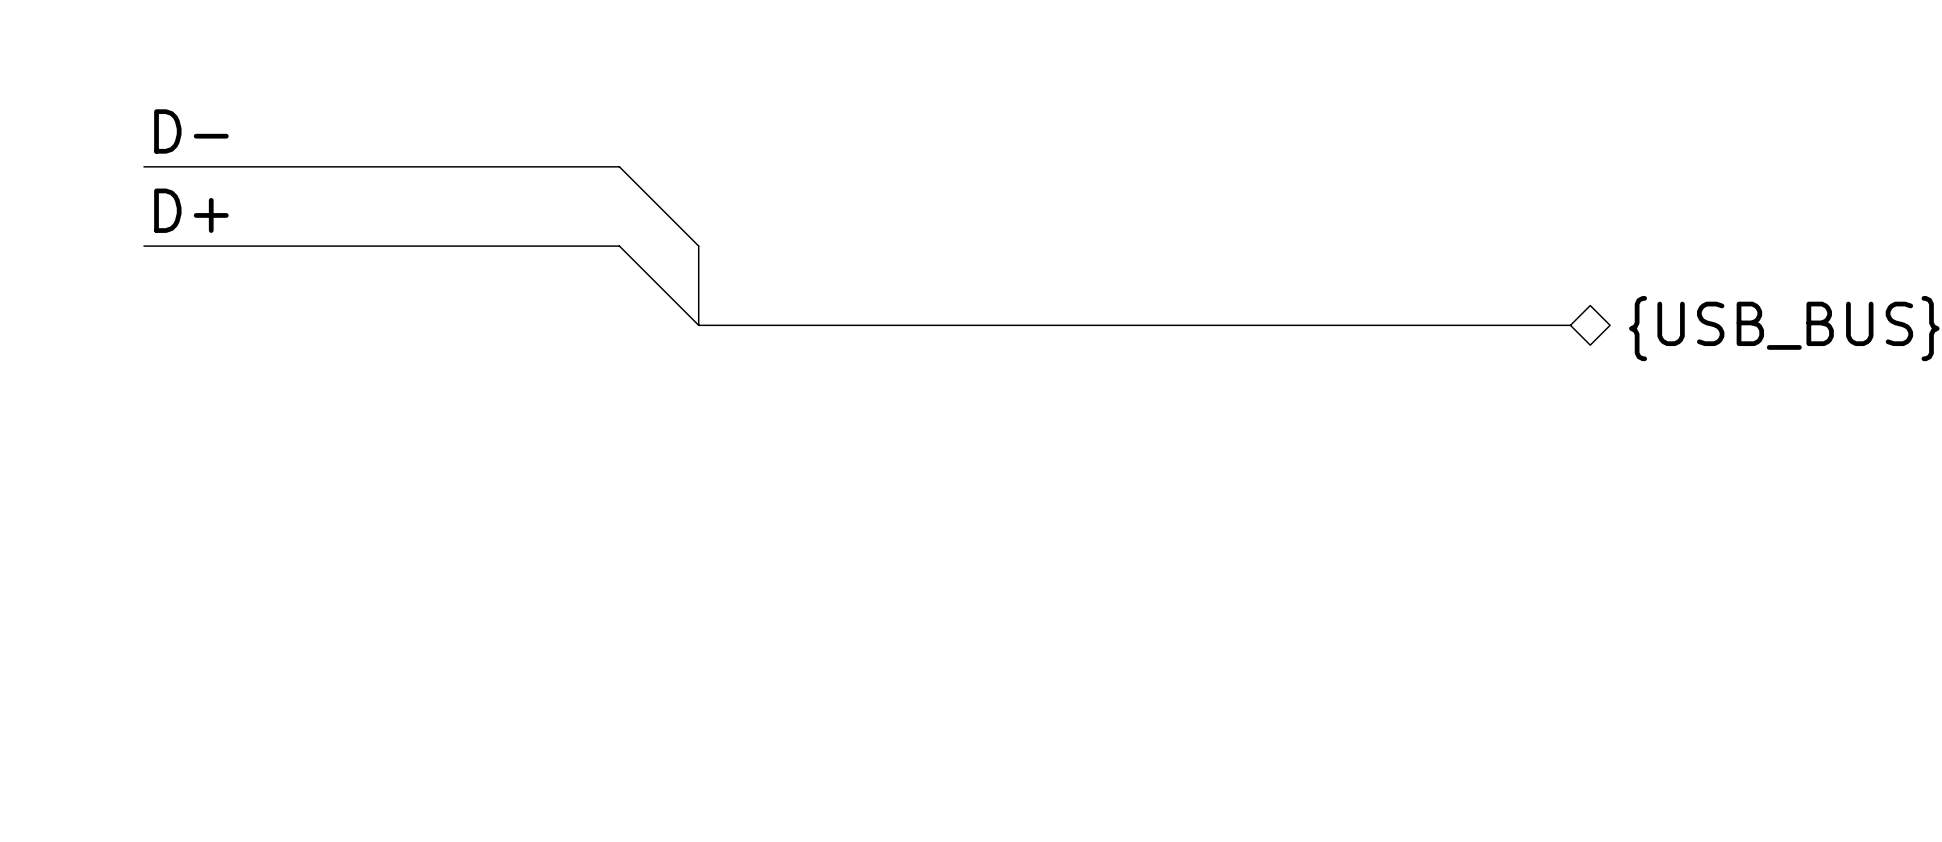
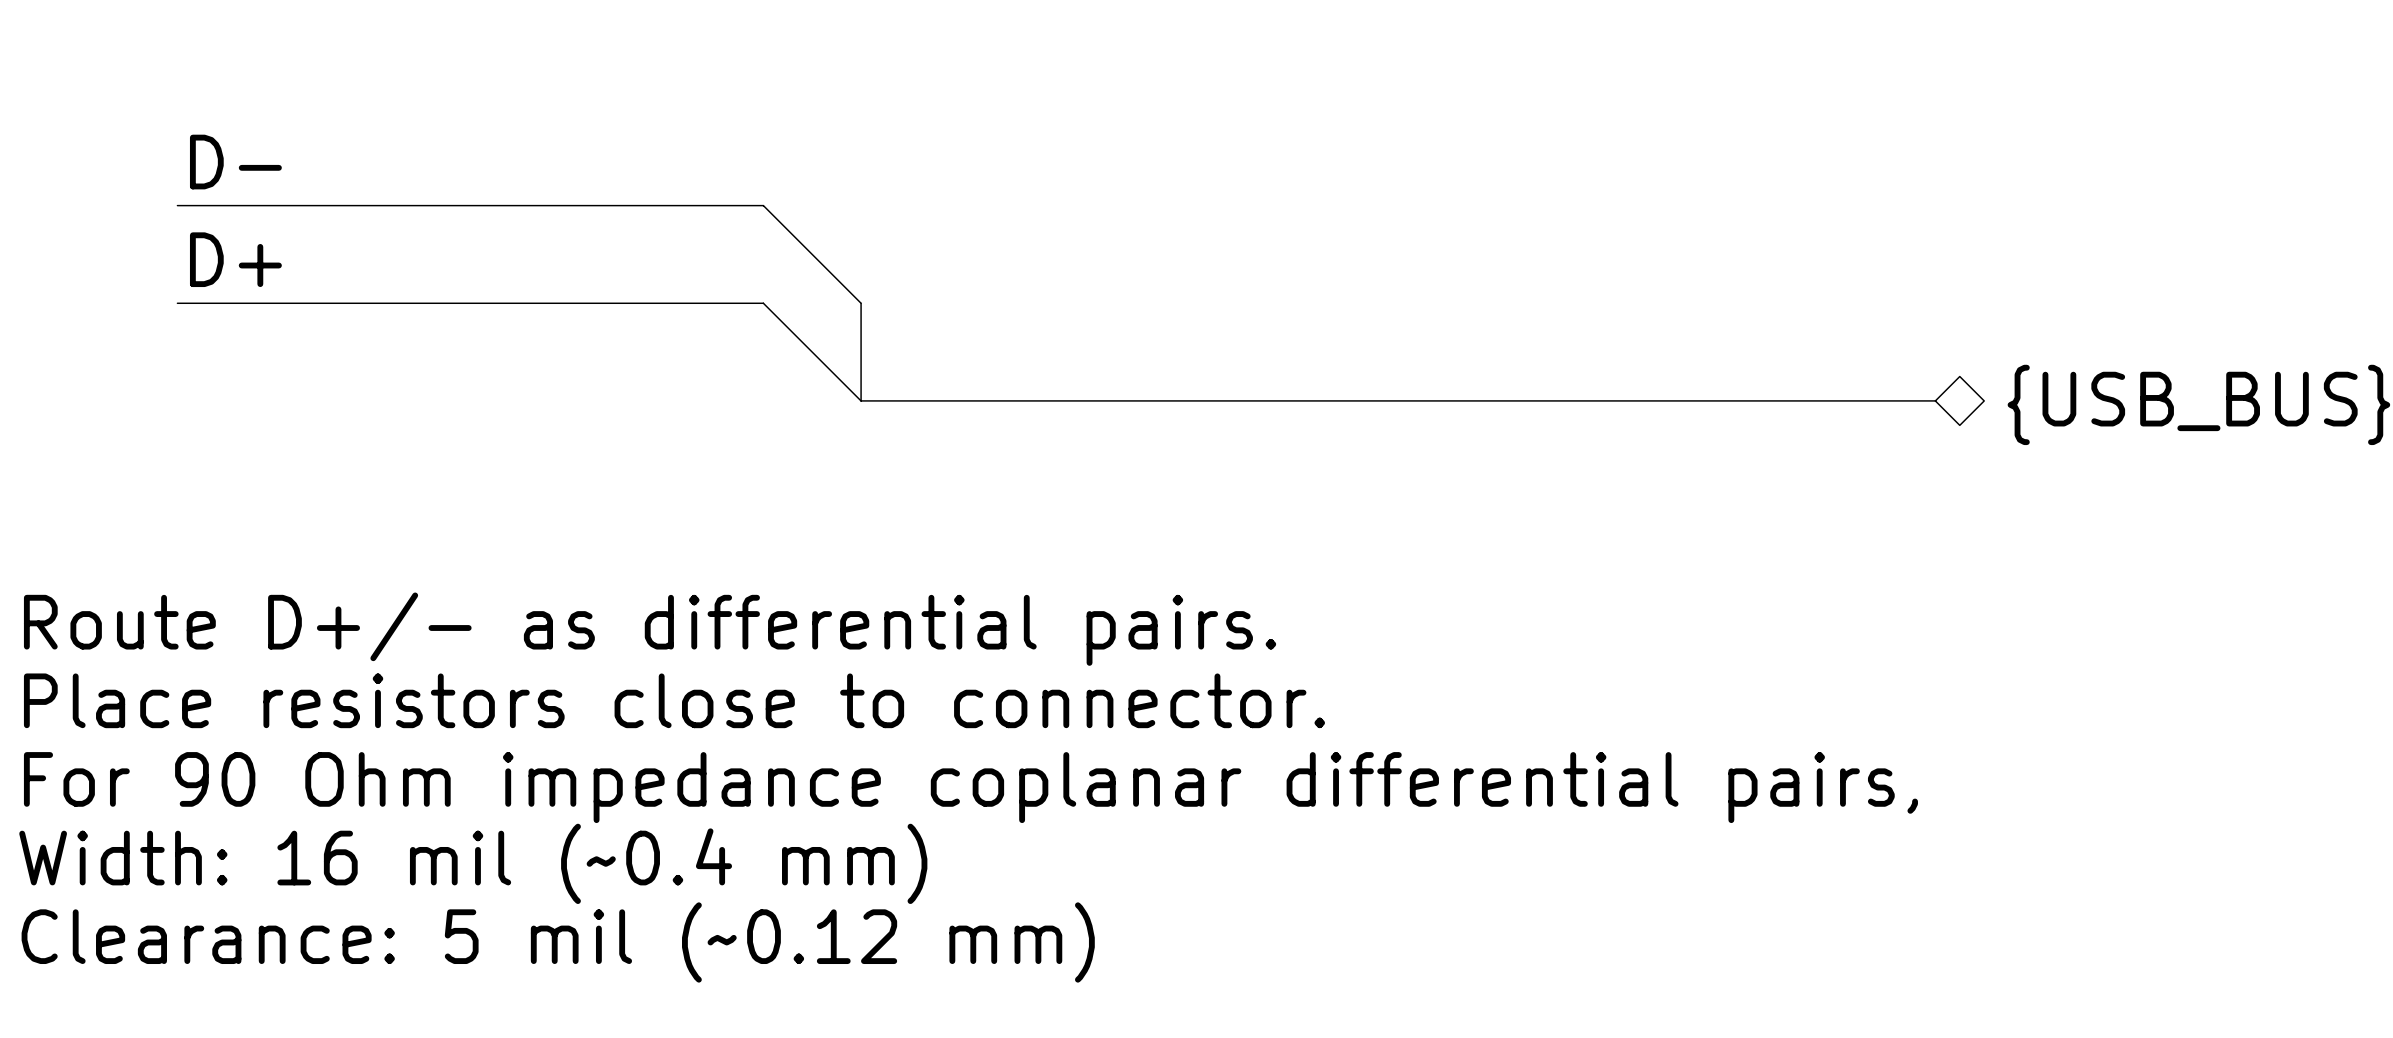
text: none -> Route D+/- as differential pairs. (650, 629)
text: none -> Place resistors close to connector. (674, 700)
text: none -> For 90 Ohm impedance coplanar differential pairs, (970, 787)
text: none -> Width: 16 mil (~0.4 mm) (473, 863)
text: none -> Clearance: 5 mil (~0.12 mm) (558, 942)

